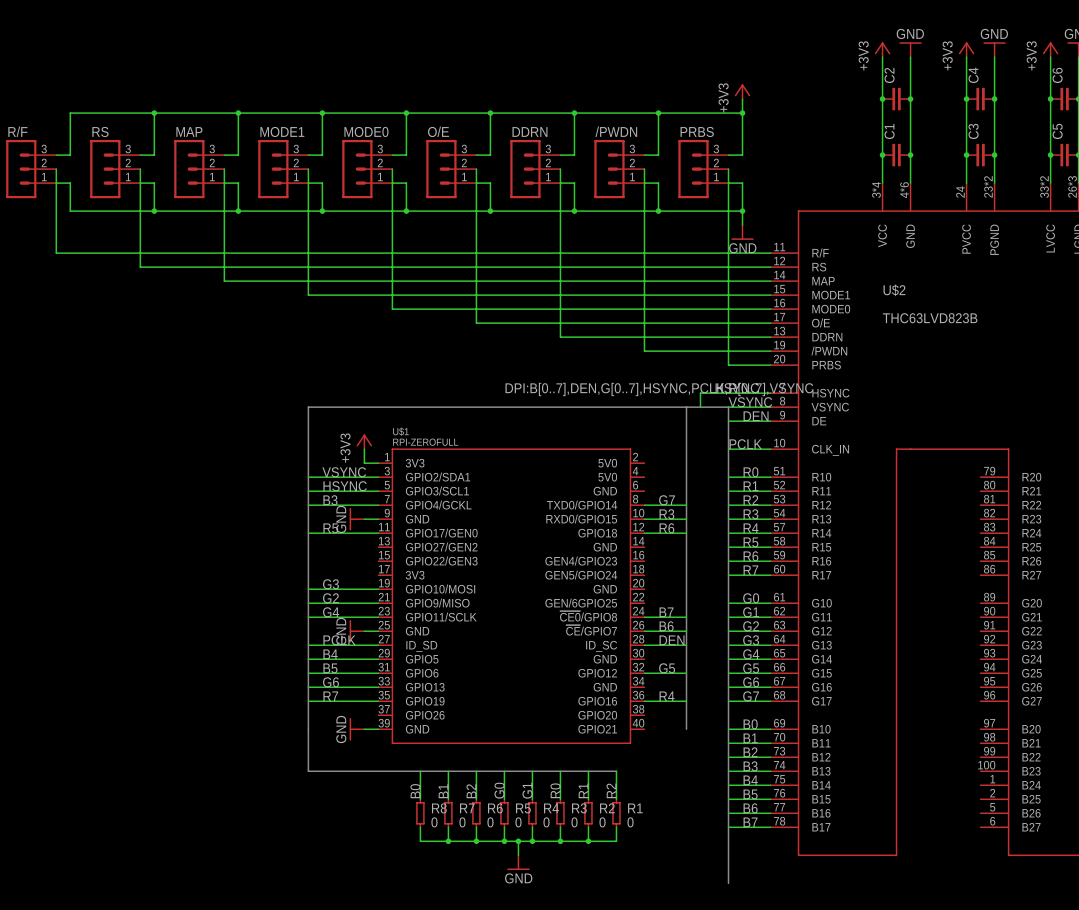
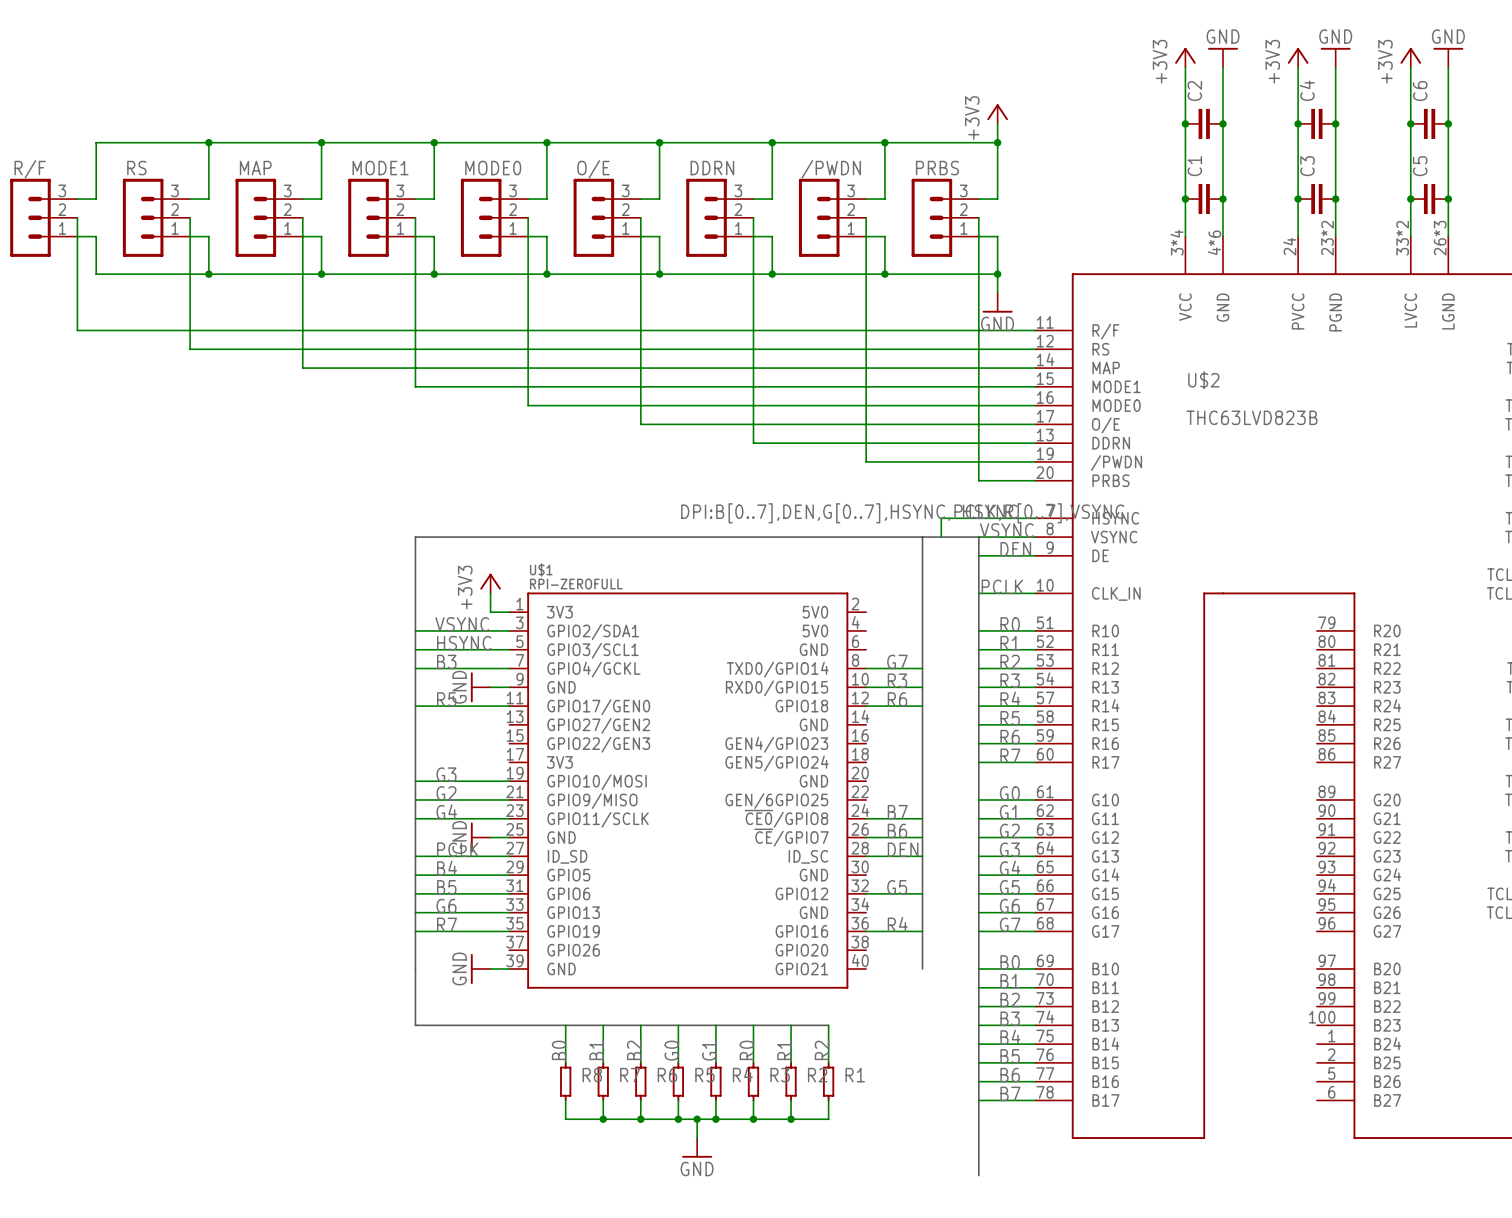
R8 value: 0 (434, 822) -> none
R7 value: 0 (462, 822) -> none
R6 value: 0 (490, 822) -> none
R5 value: 0 (518, 822) -> none
R4 value: 0 (546, 822) -> none
R3 value: 0 (574, 822) -> none
R2 value: 0 (602, 822) -> none
R1 value: 0 (630, 822) -> none

